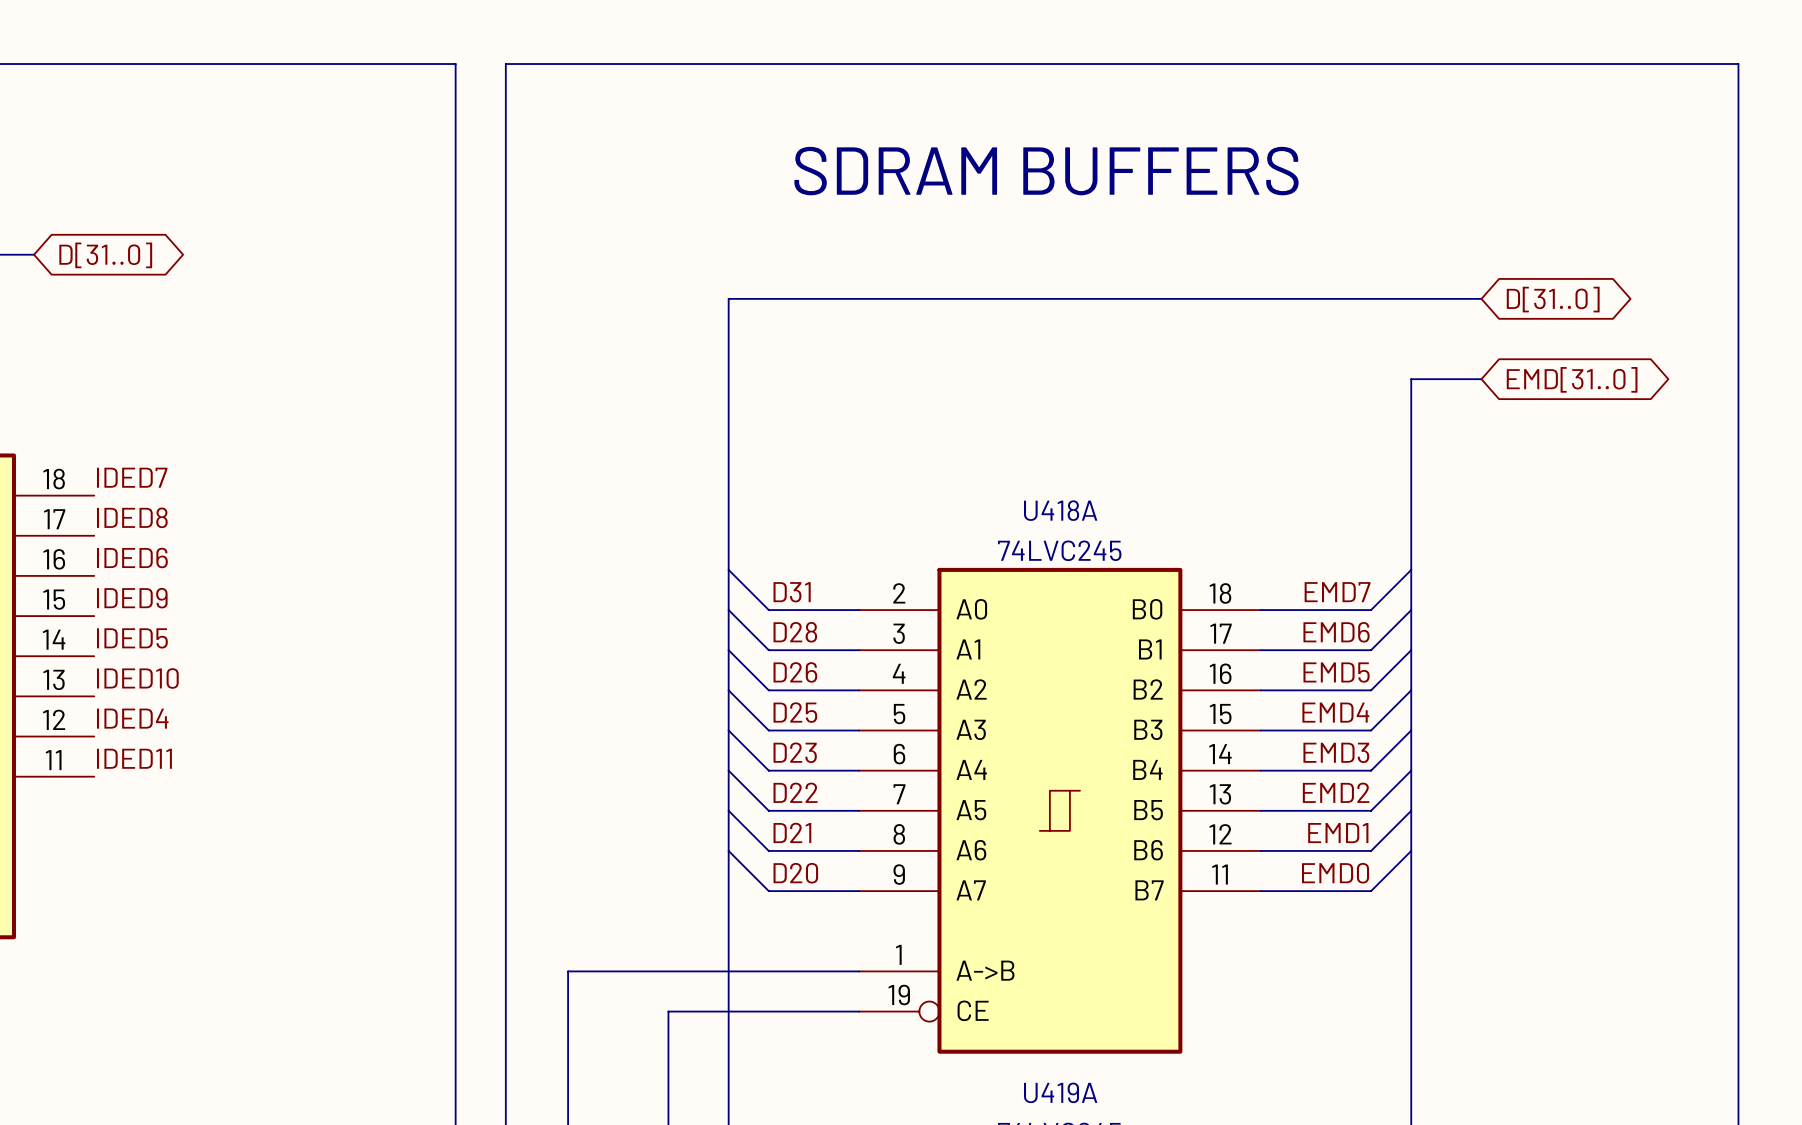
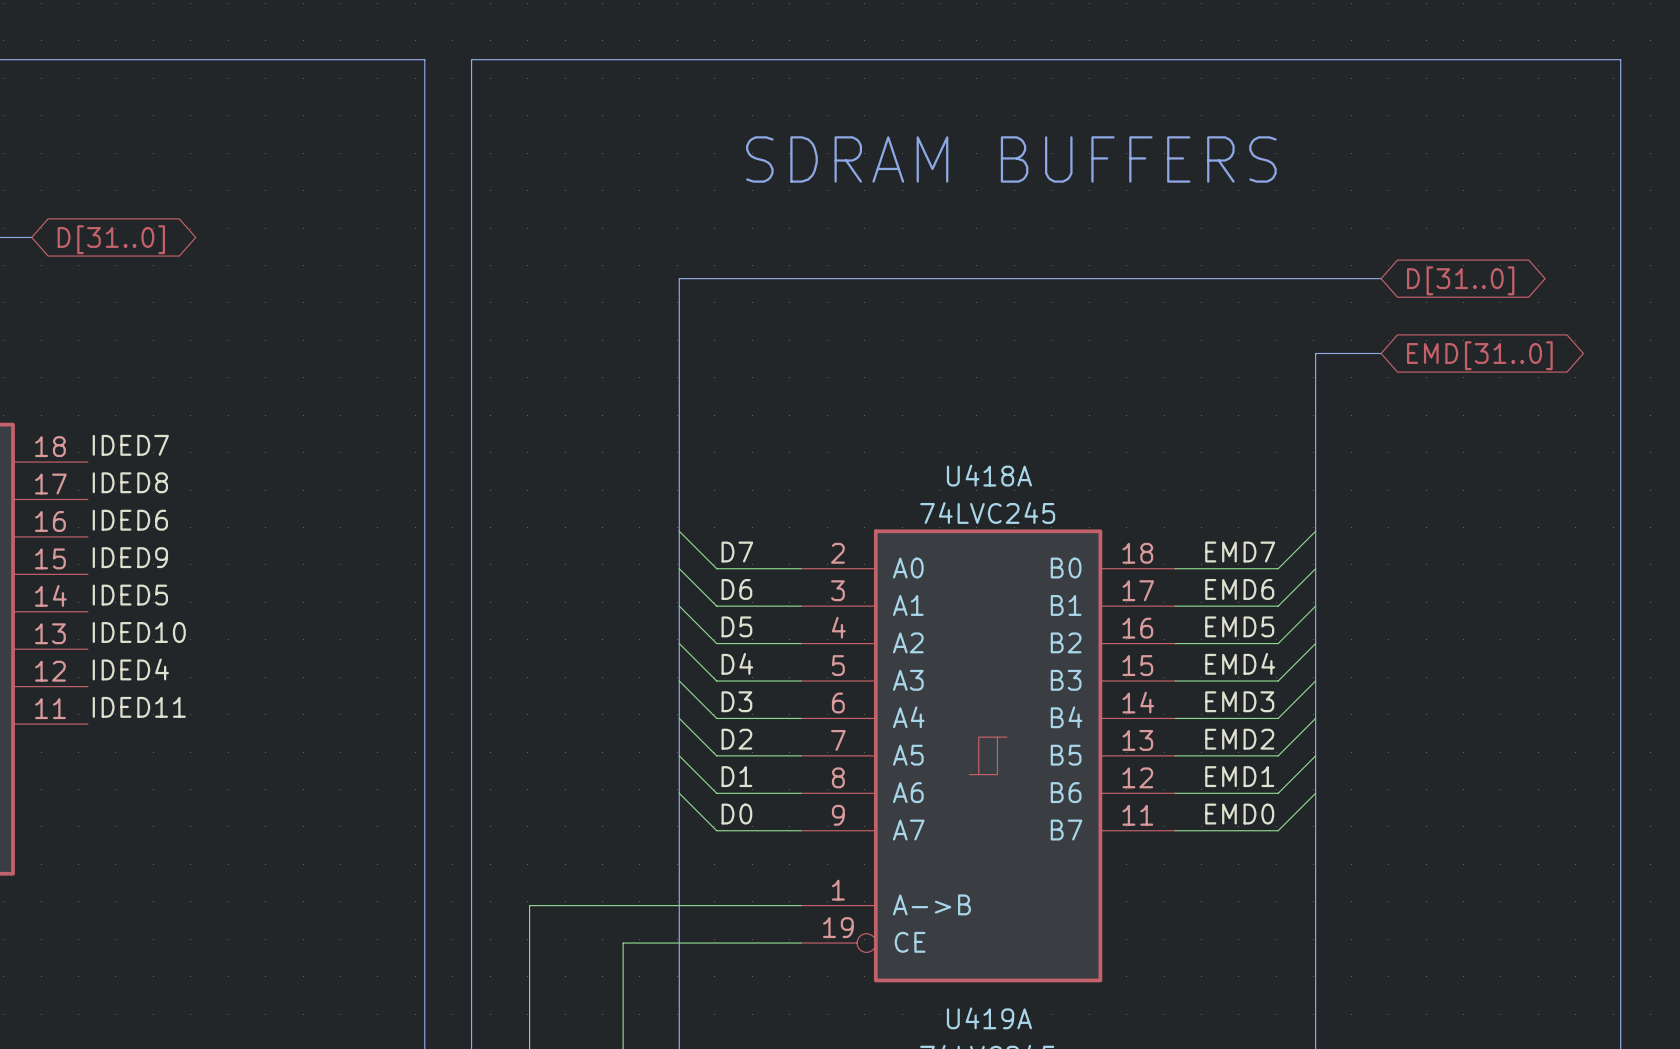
label: D31 (792, 592) -> D7 (737, 552)
label: D28 (795, 632) -> D6 (736, 589)
label: D26 (795, 672) -> D5 (736, 626)
label: D25 (795, 712) -> D4 (737, 663)
label: D23 (795, 752) -> D3 (736, 701)
label: D22 (795, 792) -> D2 (736, 739)
label: D21 (792, 832) -> D1 (736, 776)
label: D20 (795, 873) -> D0 (736, 814)

